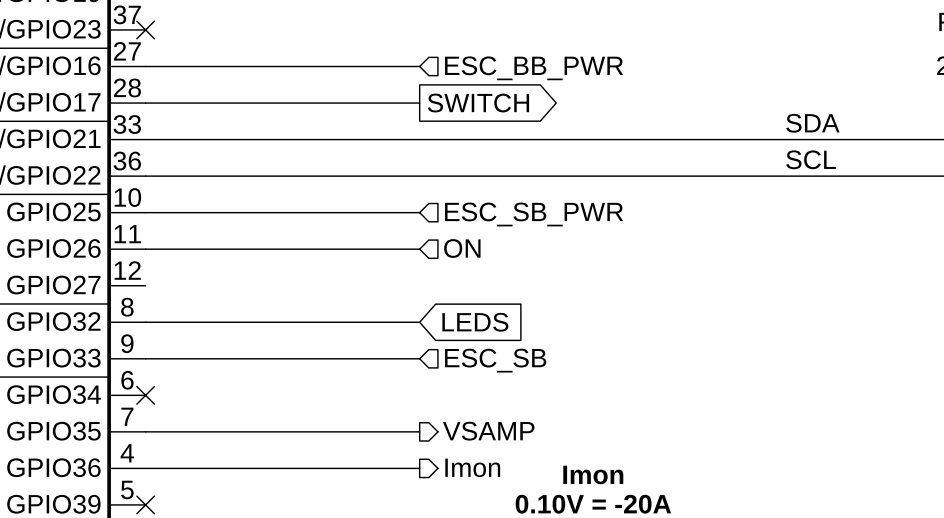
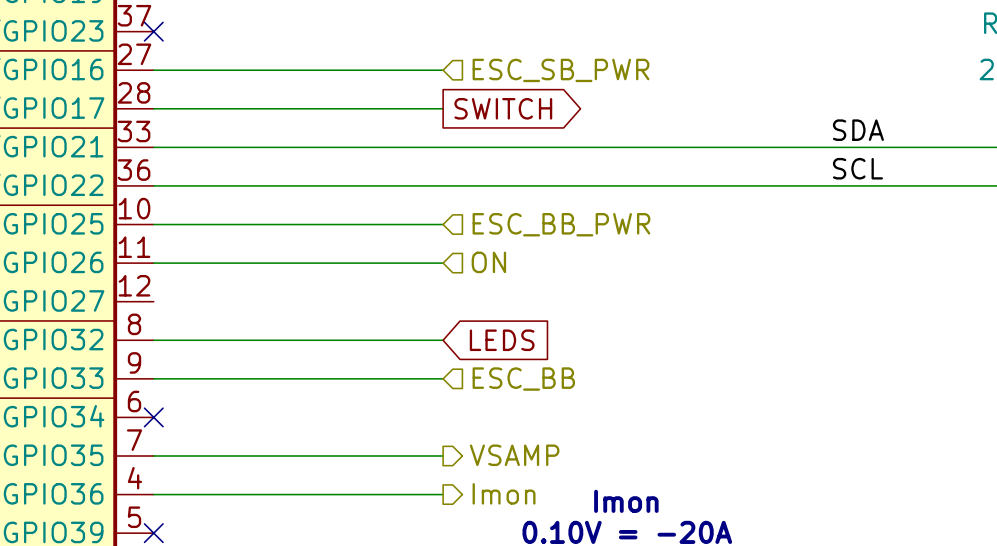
hierarchical label: ESC_BB_PWR (534, 68) -> ESC_SB_PWR (560, 70)
hierarchical label: ESC_SB_PWR (534, 214) -> ESC_BB_PWR (561, 224)
hierarchical label: ESC_SB (495, 360) -> ESC_BB (523, 379)

